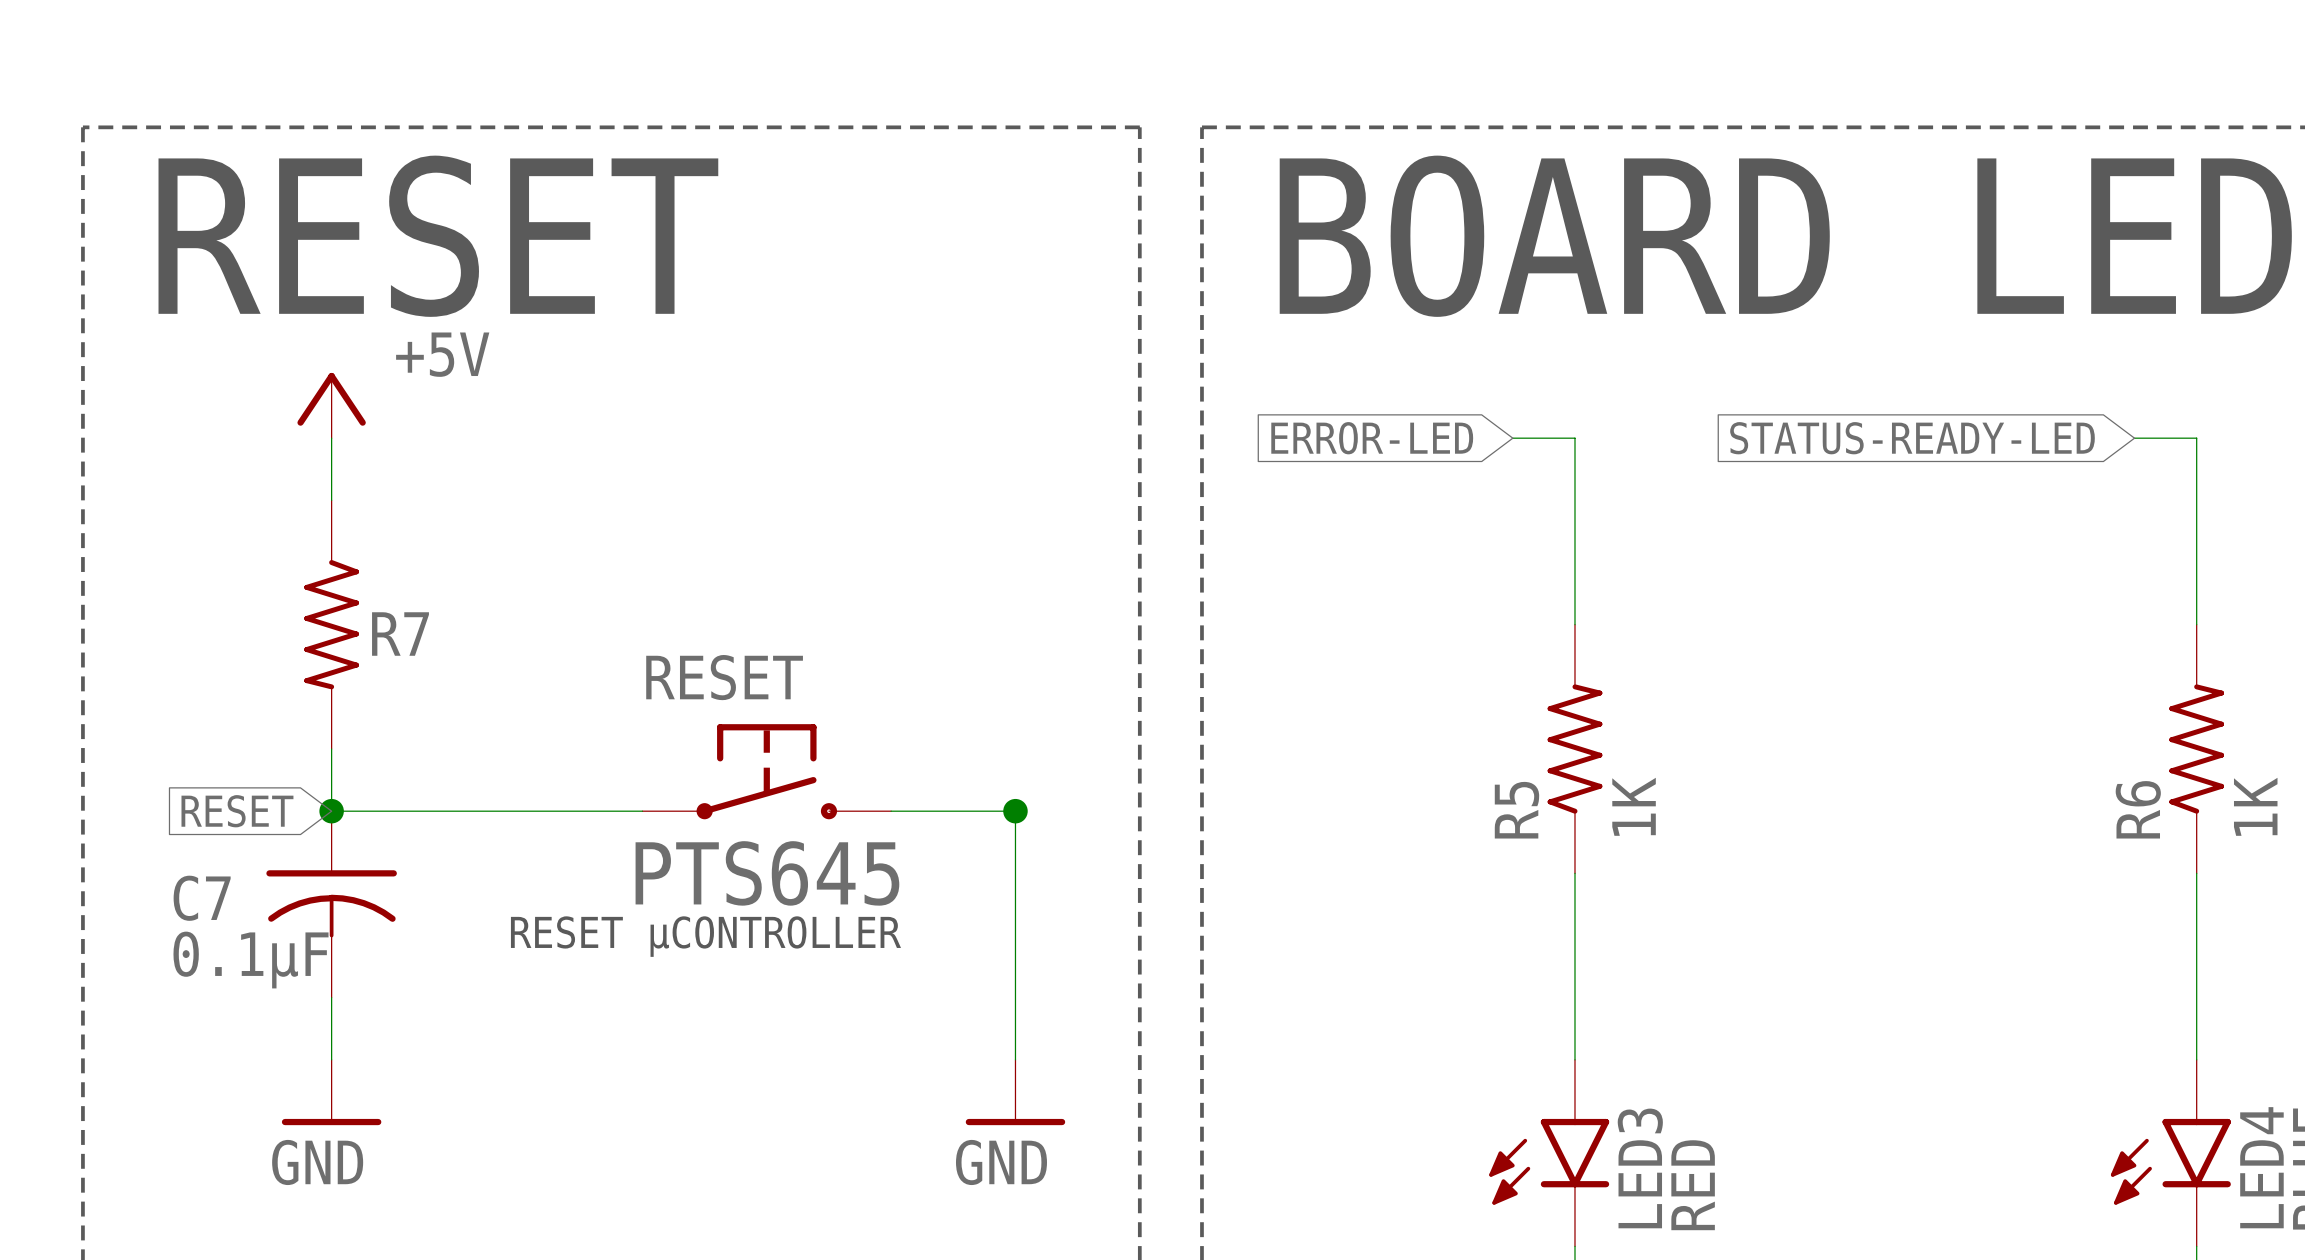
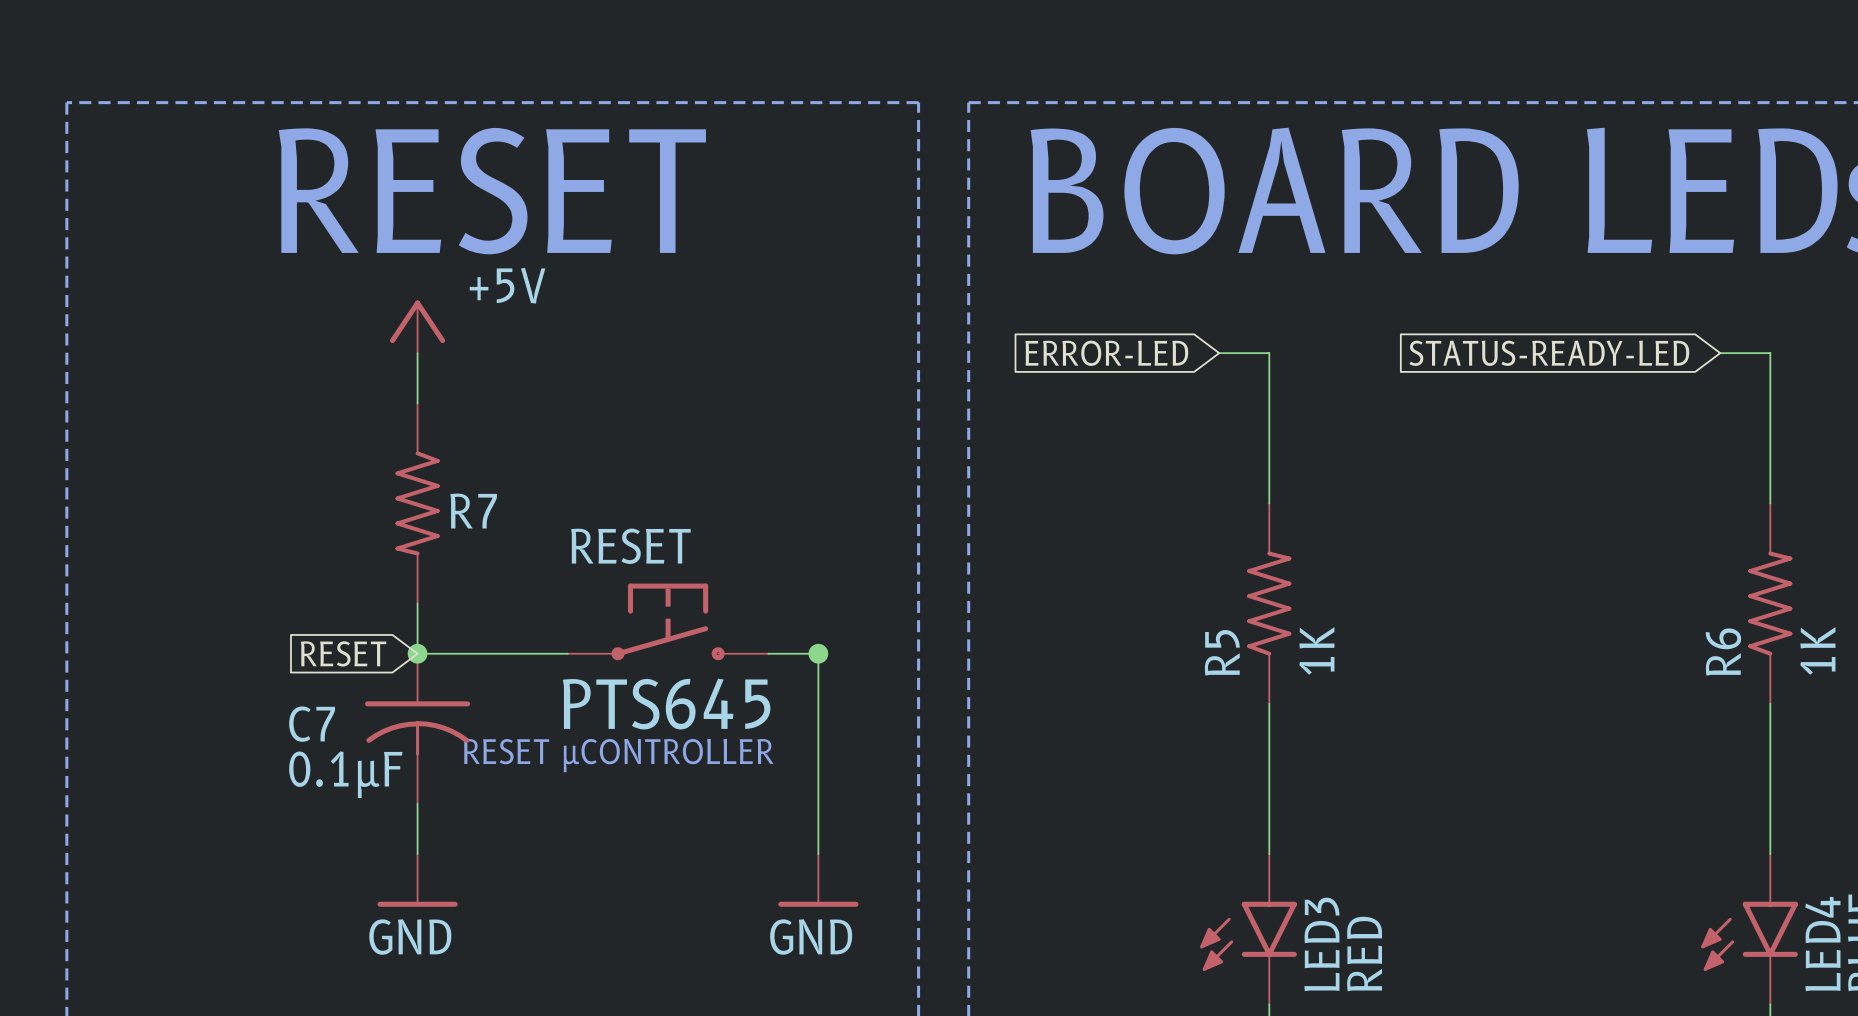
text position: RESET (438, 236) -> RESET (492, 191)
power symbol position: +5V (331, 405) -> +5V (417, 326)
wire: (331, 438) (331, 500) -> (417, 353) (417, 403)
R7 position: (331, 624) -> (417, 503)
wire: (331, 749) (331, 811) (518, 811) -> (417, 603) (417, 653)
RESET position: (766, 771) -> (668, 621)
global label position: RESET (237, 811) -> RESET (343, 653)
junction: (331, 811) -> none
junction: none -> (417, 653)
C7 position: (331, 904) -> (417, 728)
wire: (331, 997) (331, 1059) -> (417, 804) (417, 854)
power symbol position: GND (331, 1092) -> GND (417, 880)

